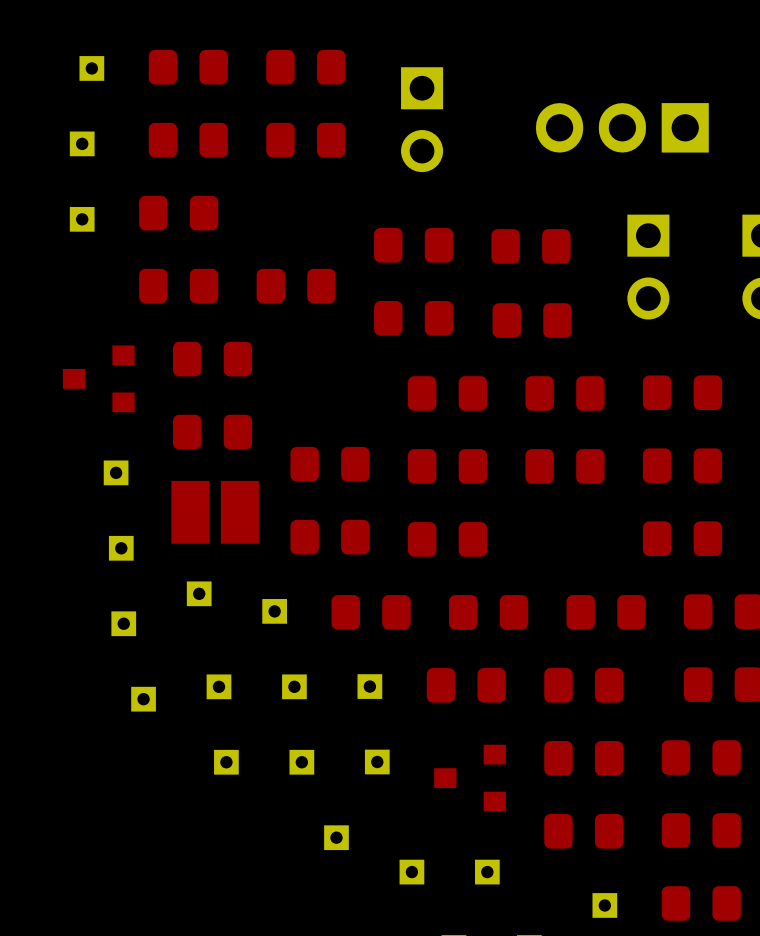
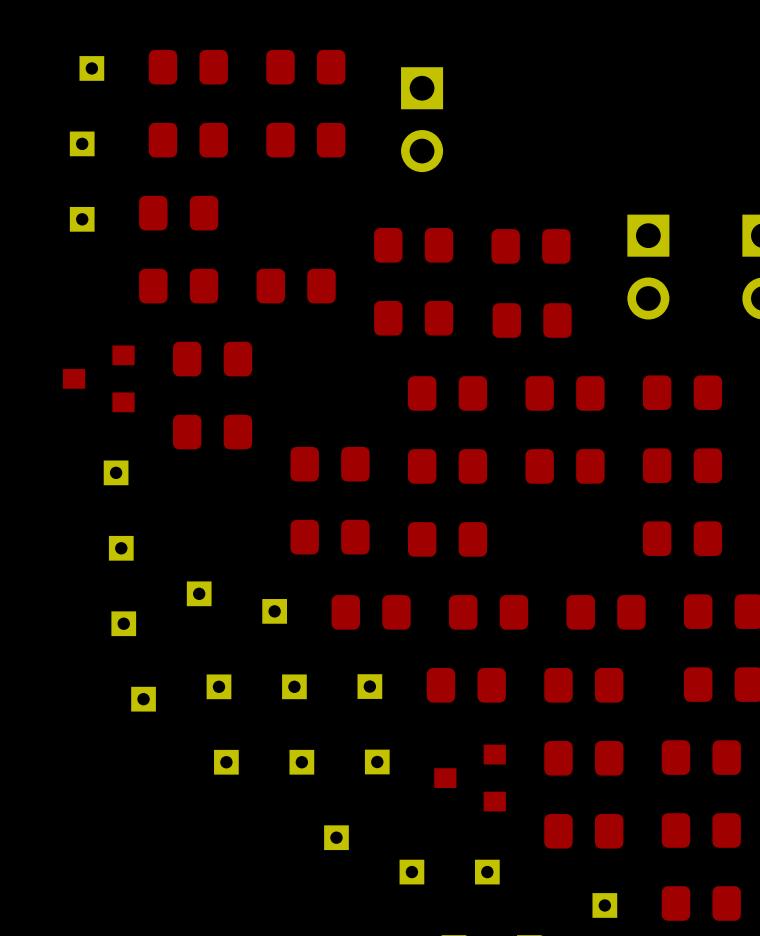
part: (622, 127) -> none
part: (215, 512) -> none

